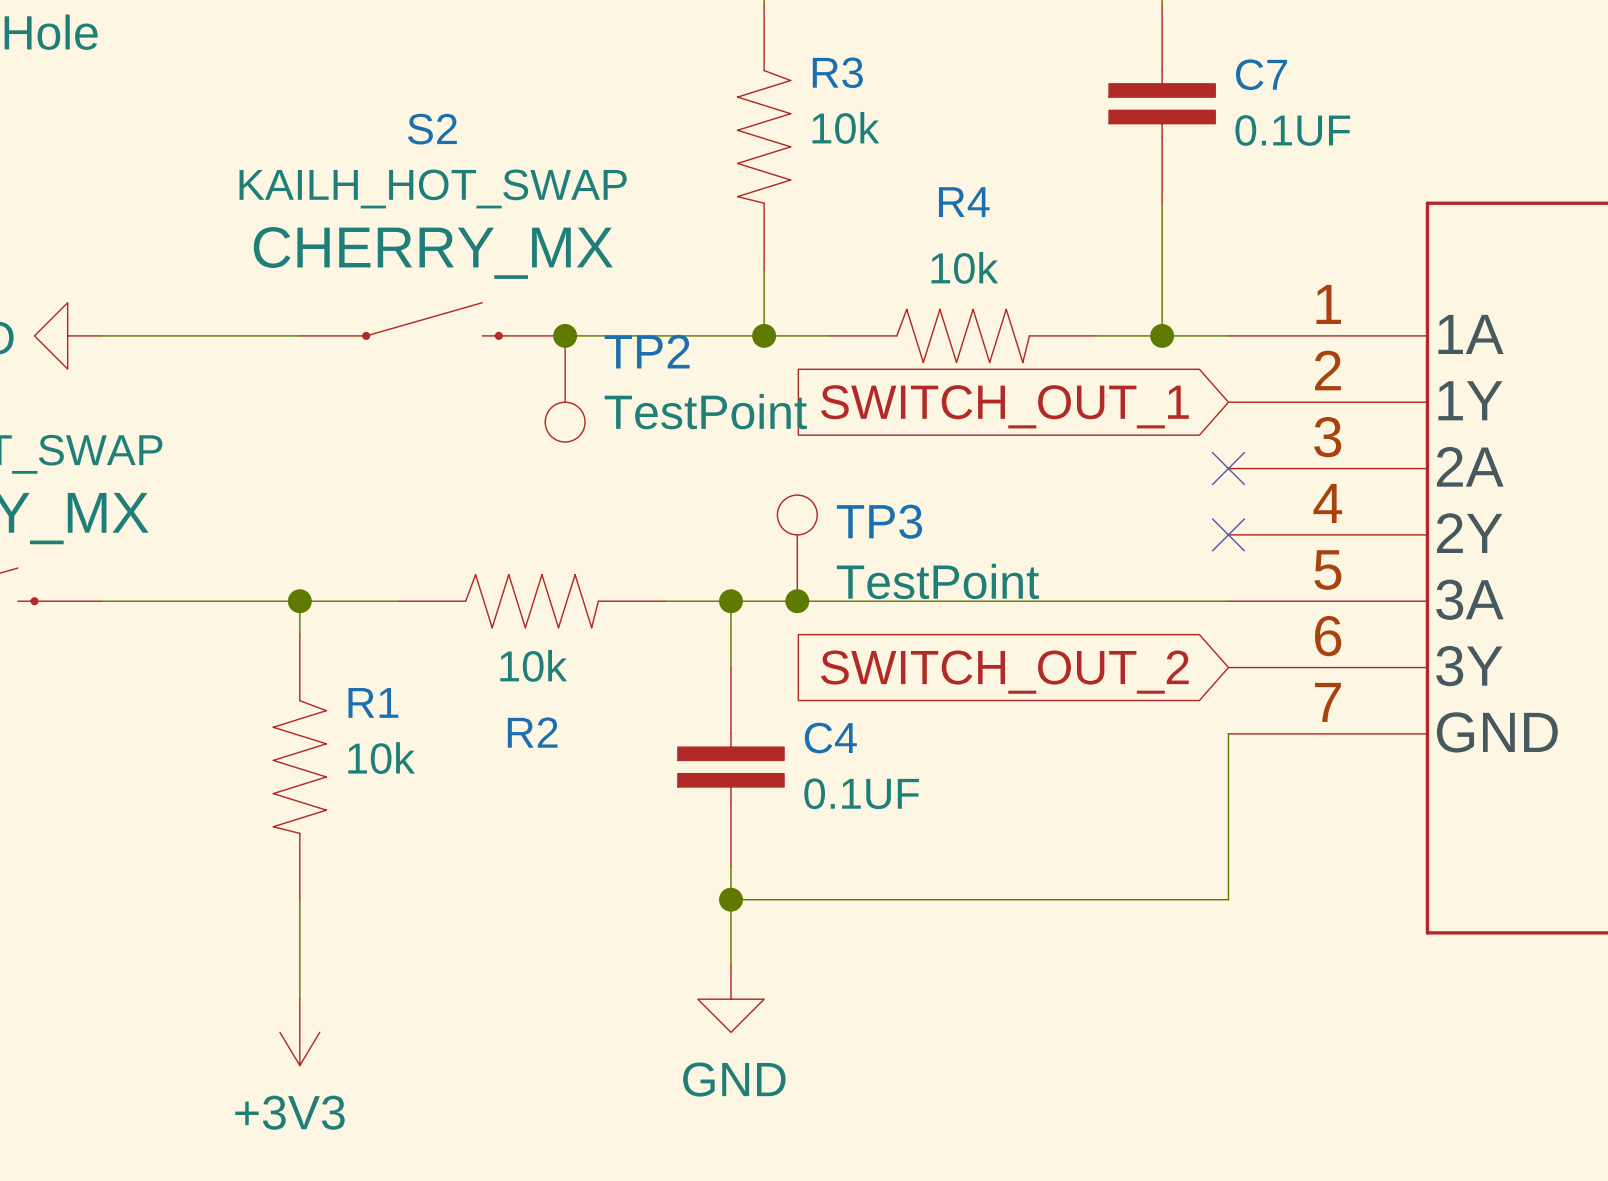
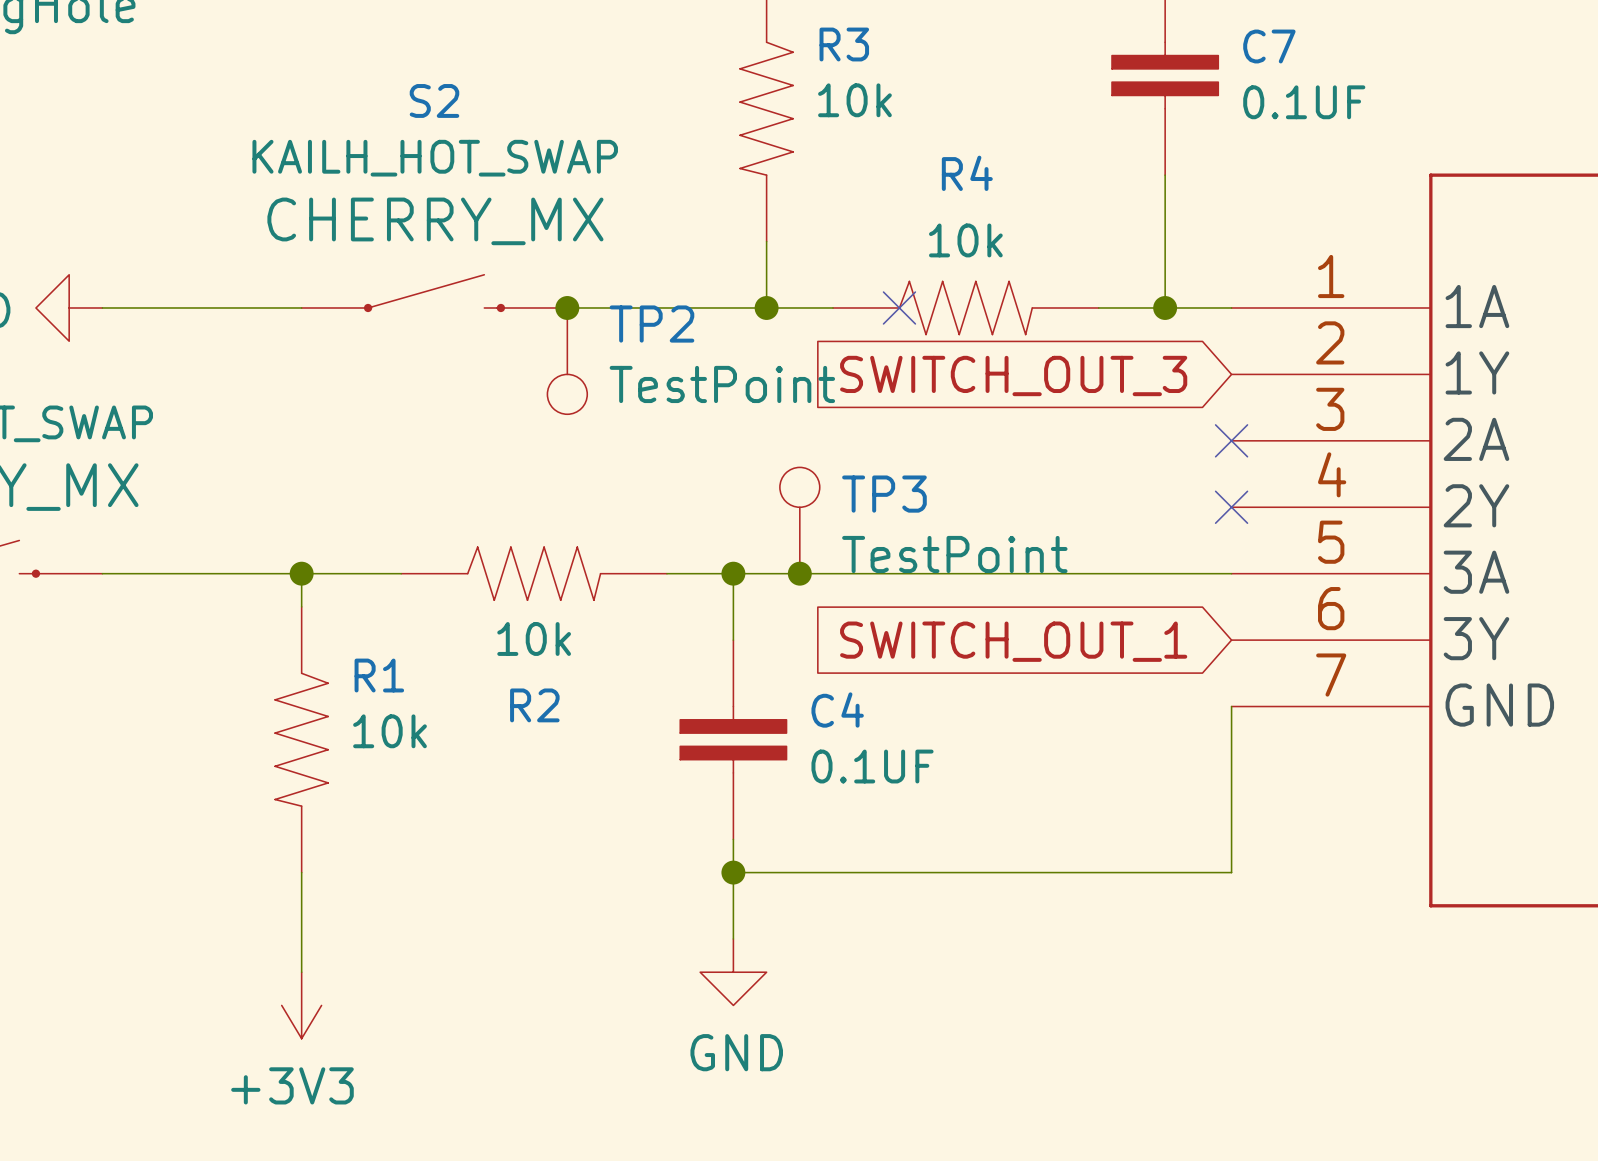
no-connect mark: none -> (899, 307)
global label: SWITCH_OUT_1 (1004, 406) -> SWITCH_OUT_3 (1013, 375)
global label: SWITCH_OUT_2 (1004, 672) -> SWITCH_OUT_1 (1013, 641)

